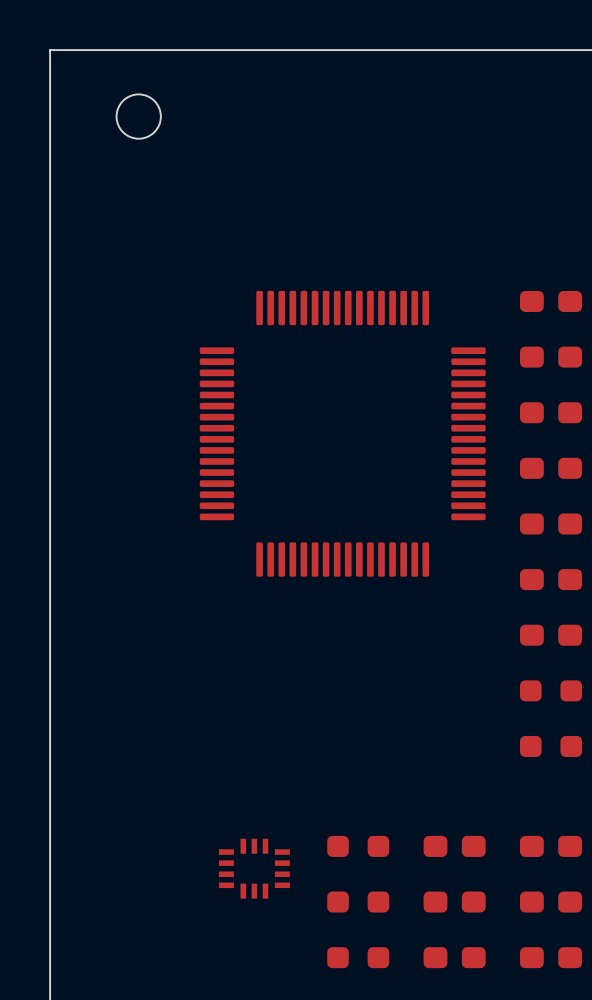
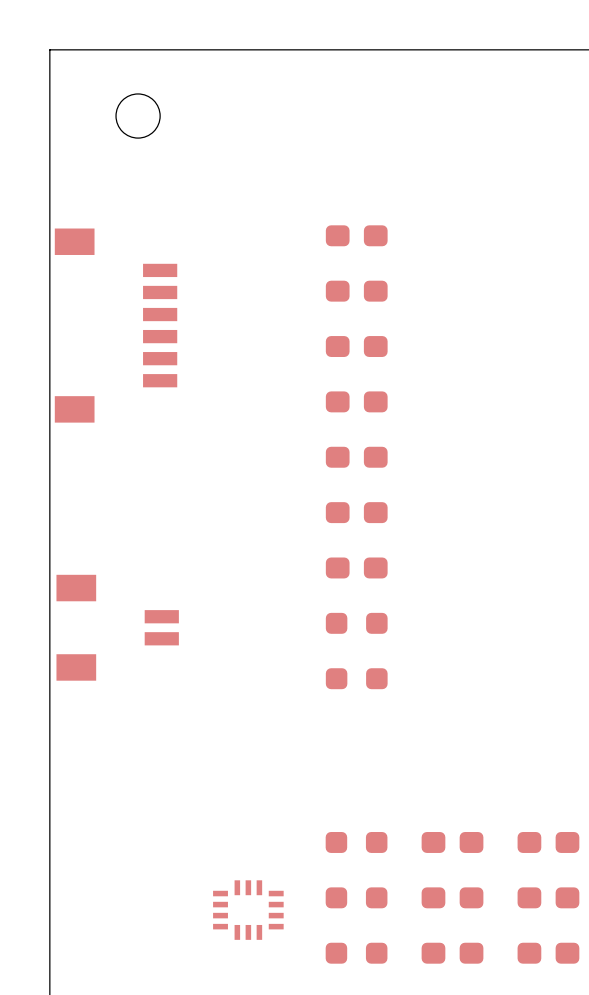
part: none -> (356, 235)
part: none -> (356, 291)
part: (551, 301) -> none
part: none -> (116, 325)
part: none -> (356, 346)
part: (551, 357) -> none
part: none -> (356, 401)
part: (551, 412) -> none
part: (342, 433) -> none
part: none -> (356, 457)
part: (551, 468) -> none
part: none -> (356, 512)
part: (551, 523) -> none
part: none -> (356, 567)
part: (551, 579) -> none
part: none -> (356, 623)
part: none -> (117, 627)
part: (551, 635) -> none
part: none -> (356, 678)
part: (551, 690) -> none
part: (551, 746) -> none
part position: (254, 868) -> (248, 910)

